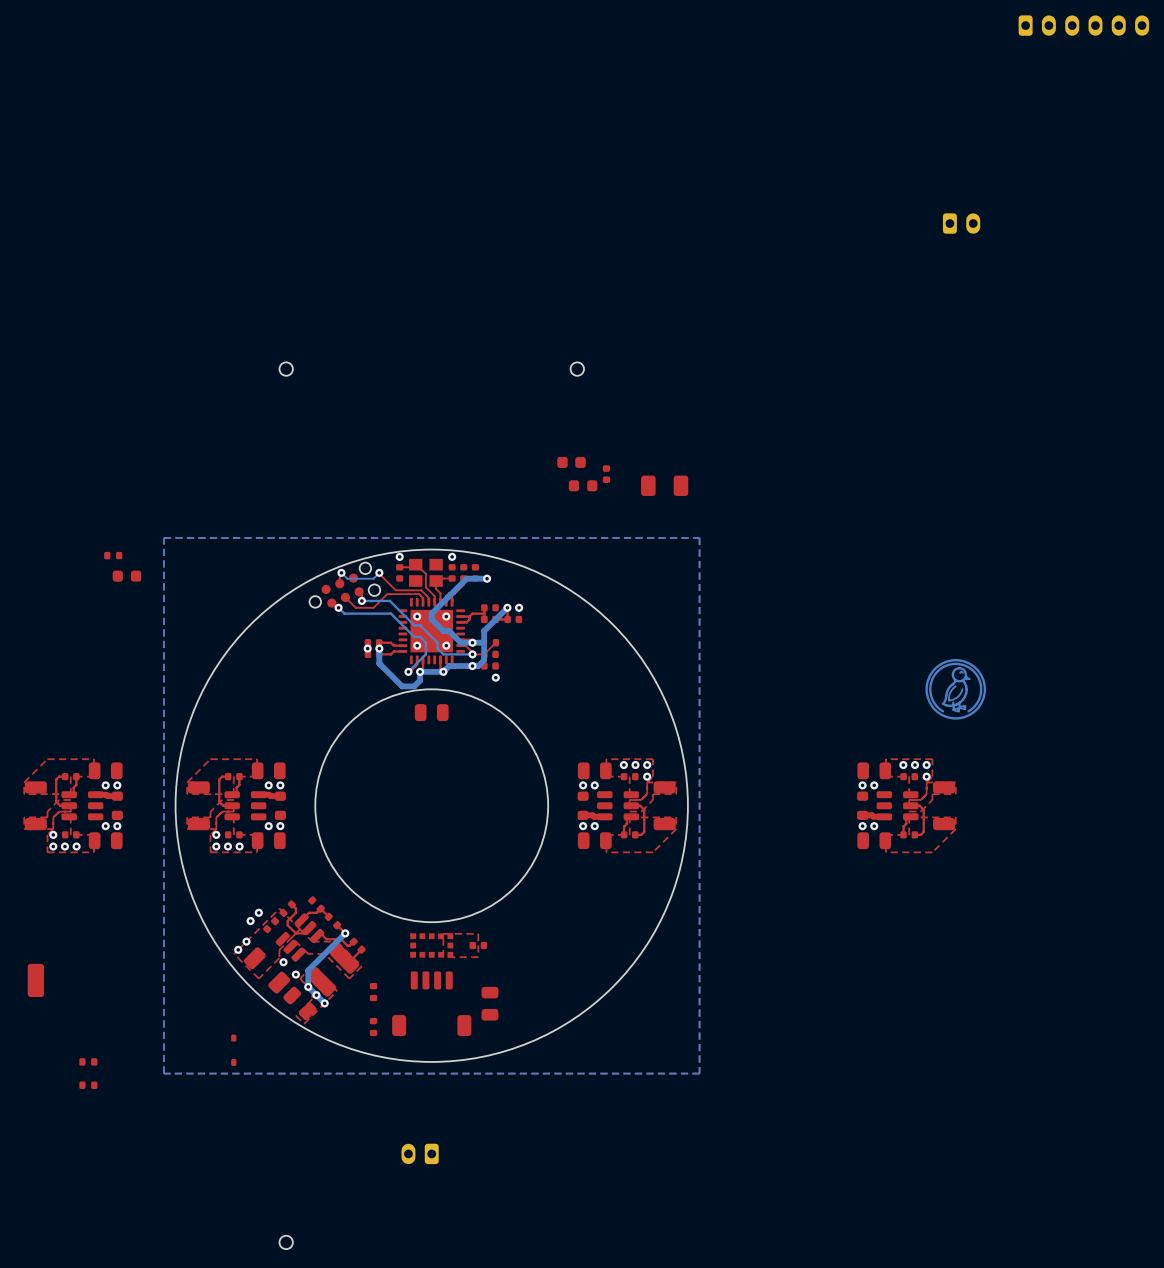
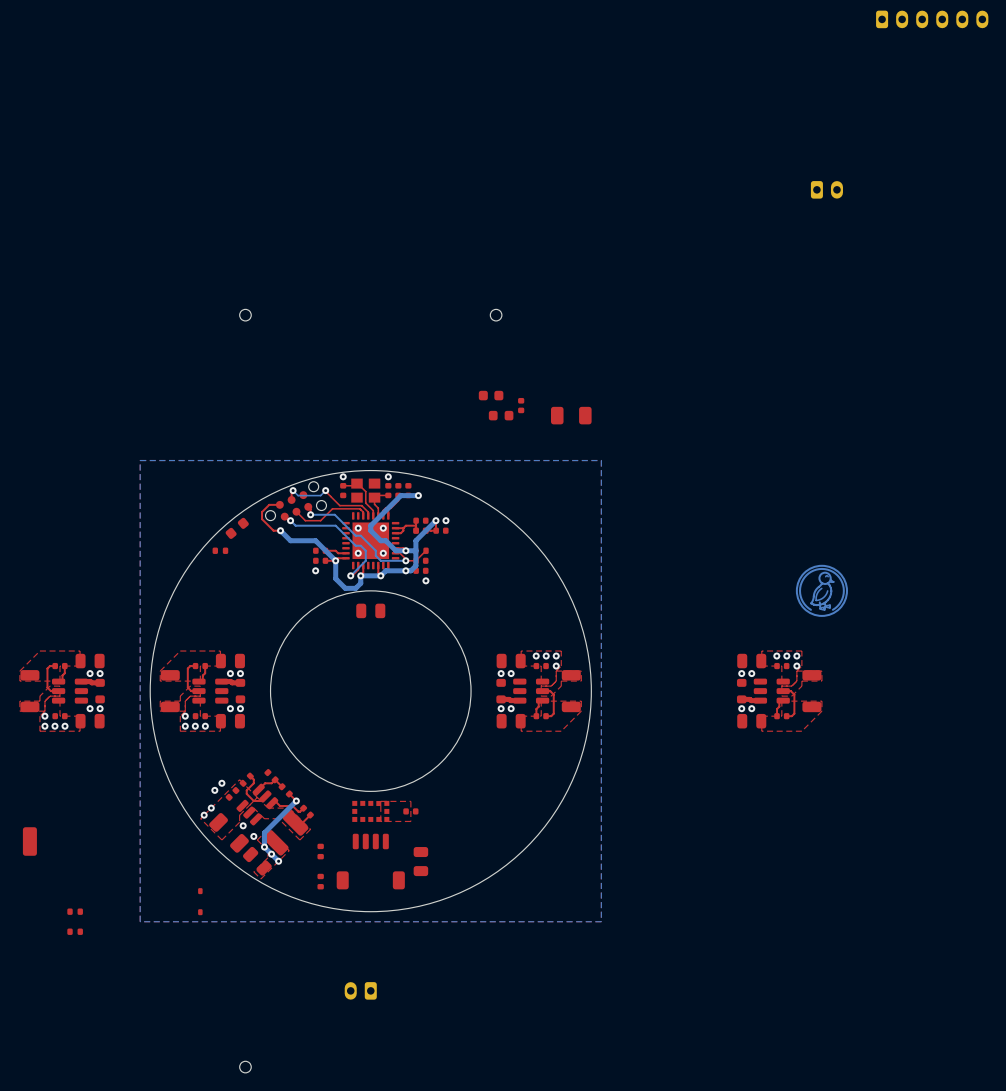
part position: (113, 555) -> (220, 550)
part: (126, 576) -> none
top track: none -> (279, 504) (269, 504) (262, 512) (262, 519) (273, 530) (280, 530)
part: none -> (237, 528)
via: none -> (280, 530)
via: (367, 648) -> none
bottom track: (379, 648) (379, 663) (390, 675) -> (280, 530) (290, 540) (315, 540) (335, 560) (335, 578)
via: (379, 648) -> none
via: none -> (335, 560)
via: none -> (315, 570)

